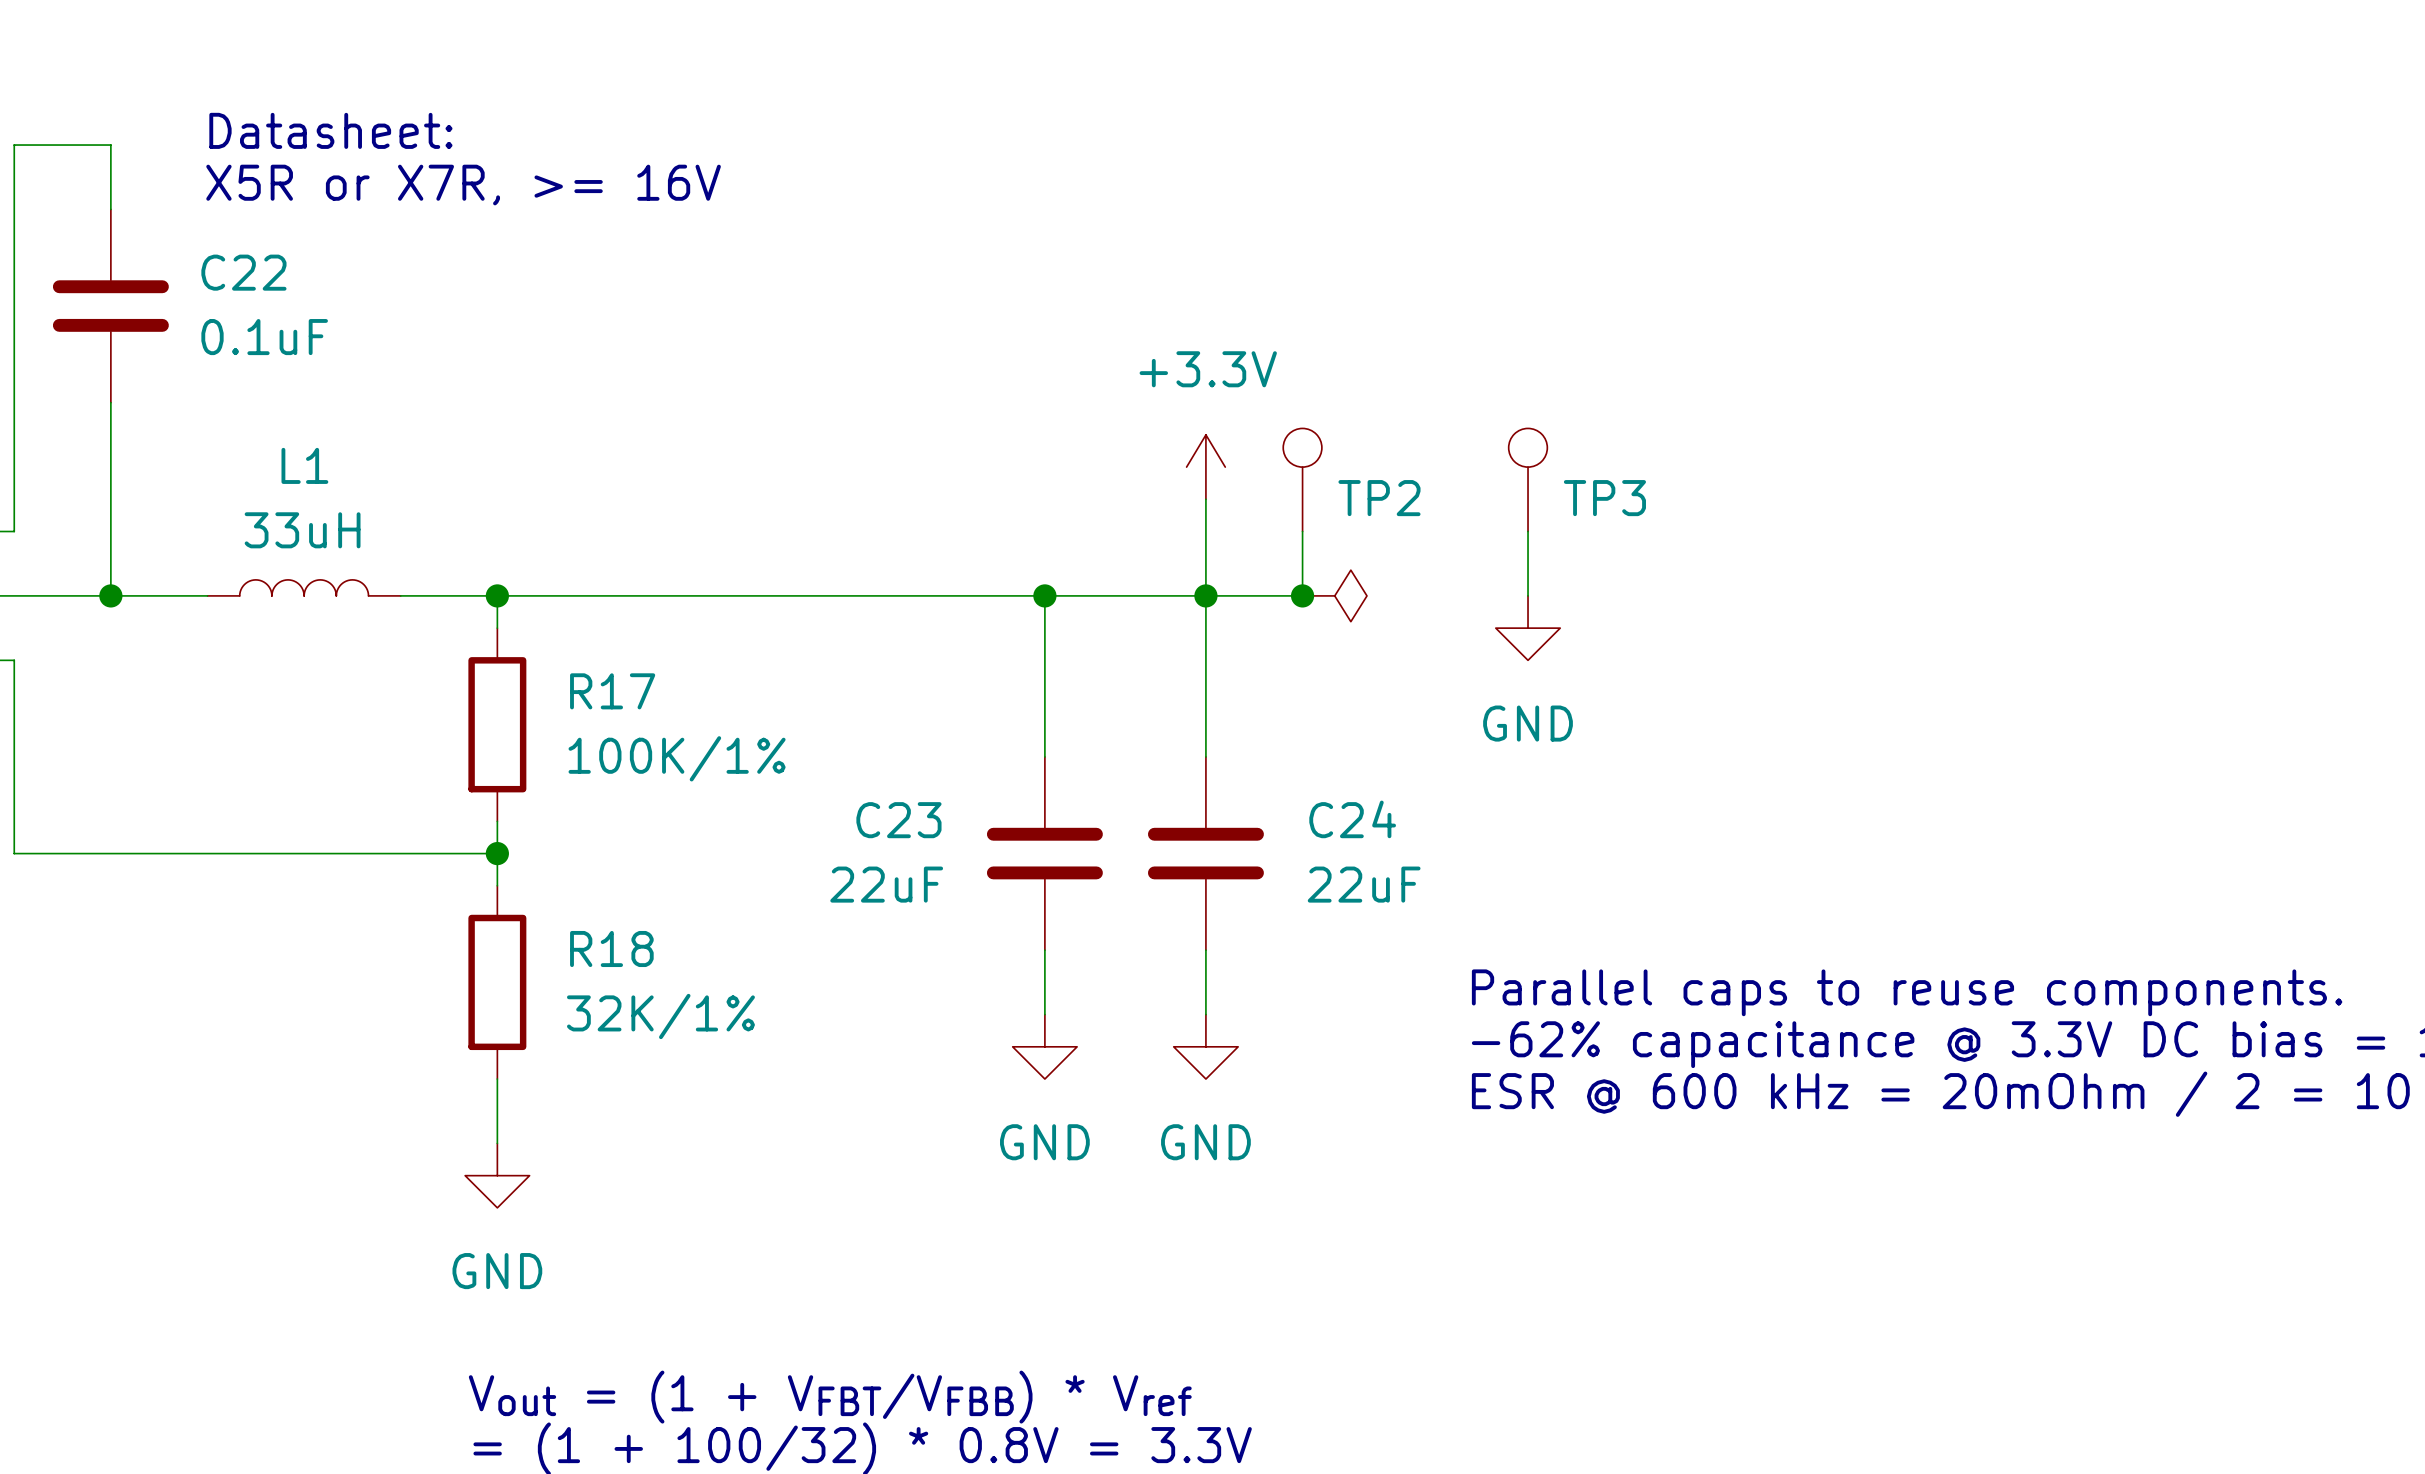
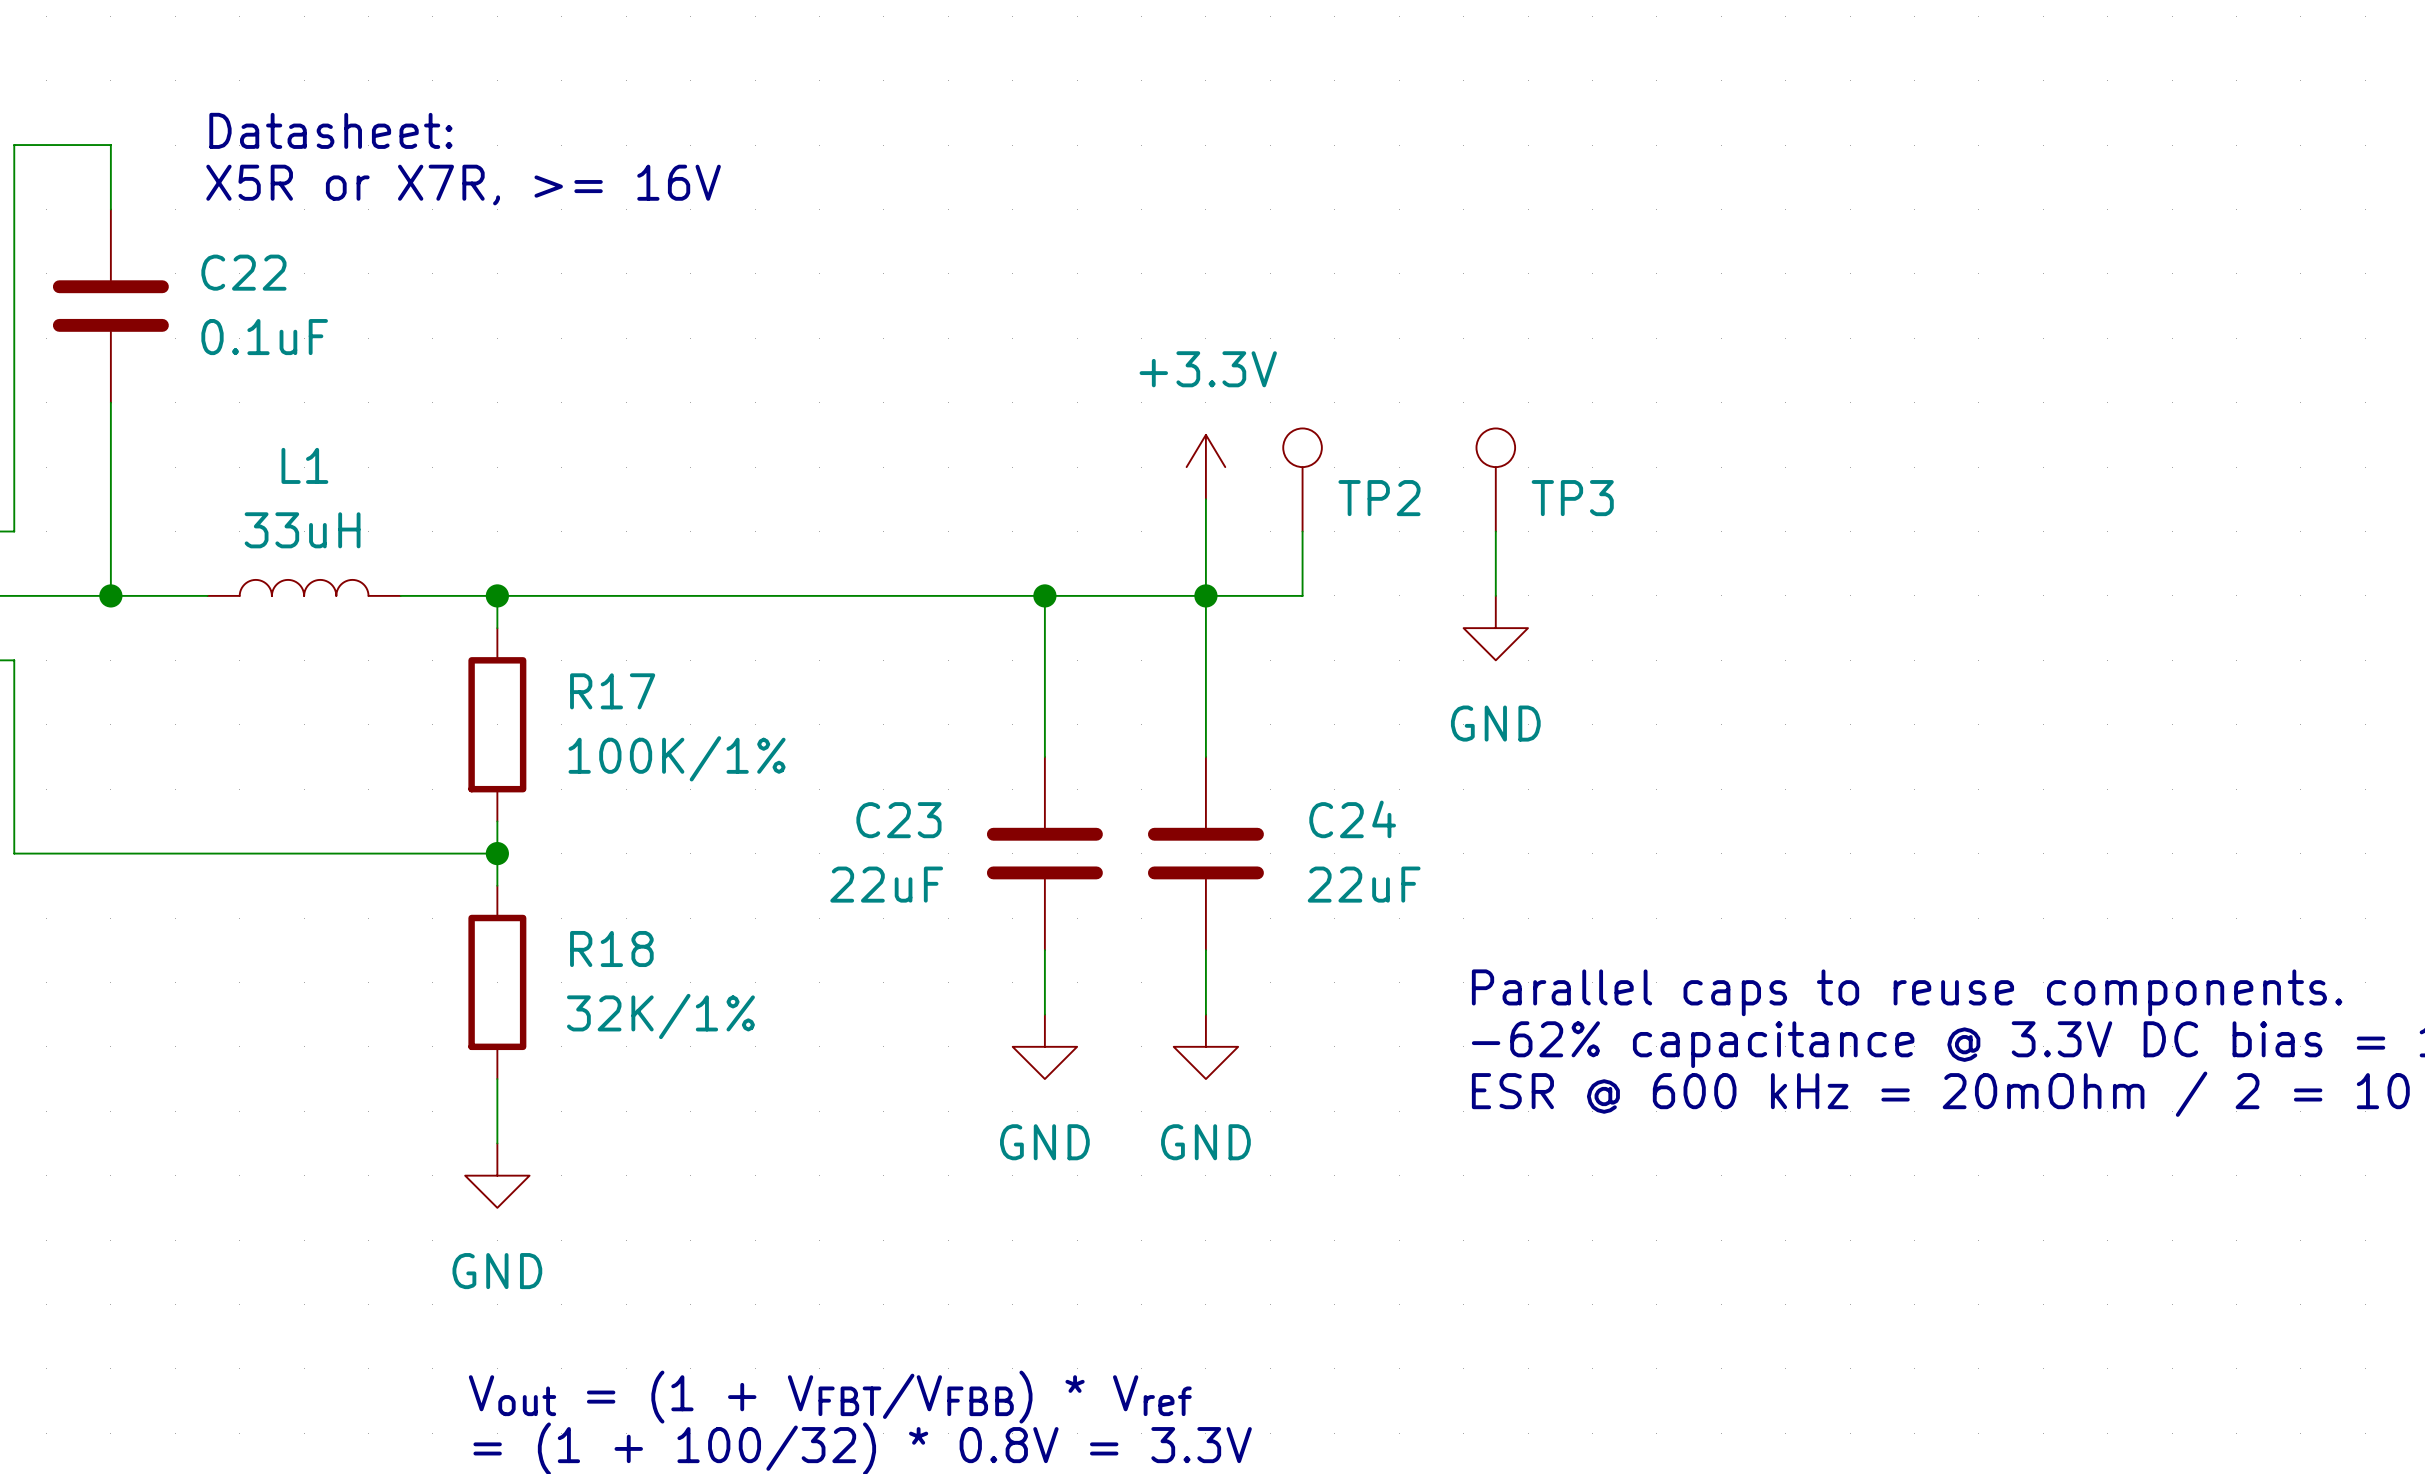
TP3 position: (1528, 479) -> (1495, 479)
wire: (1528, 531) (1528, 595) -> (1495, 531) (1495, 595)
junction: (1302, 595) -> none
power symbol: (1334, 595) -> none
power symbol position: GND (1528, 628) -> GND (1495, 628)

